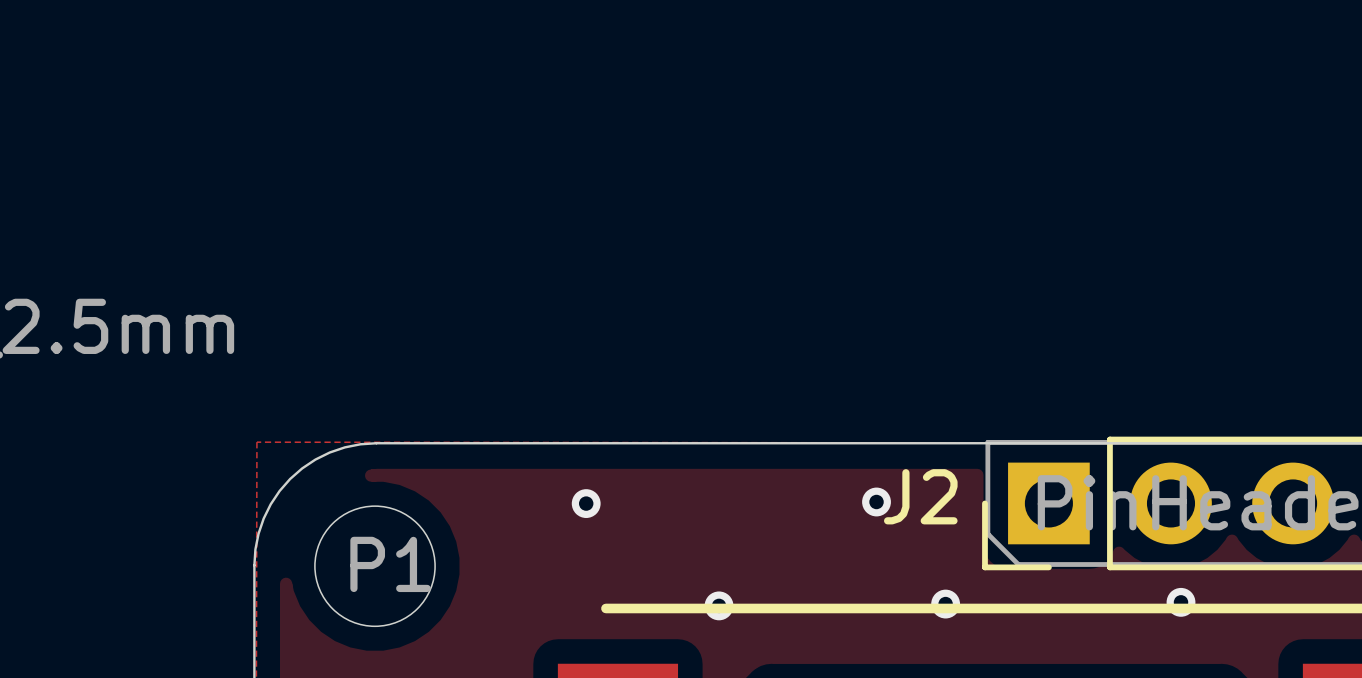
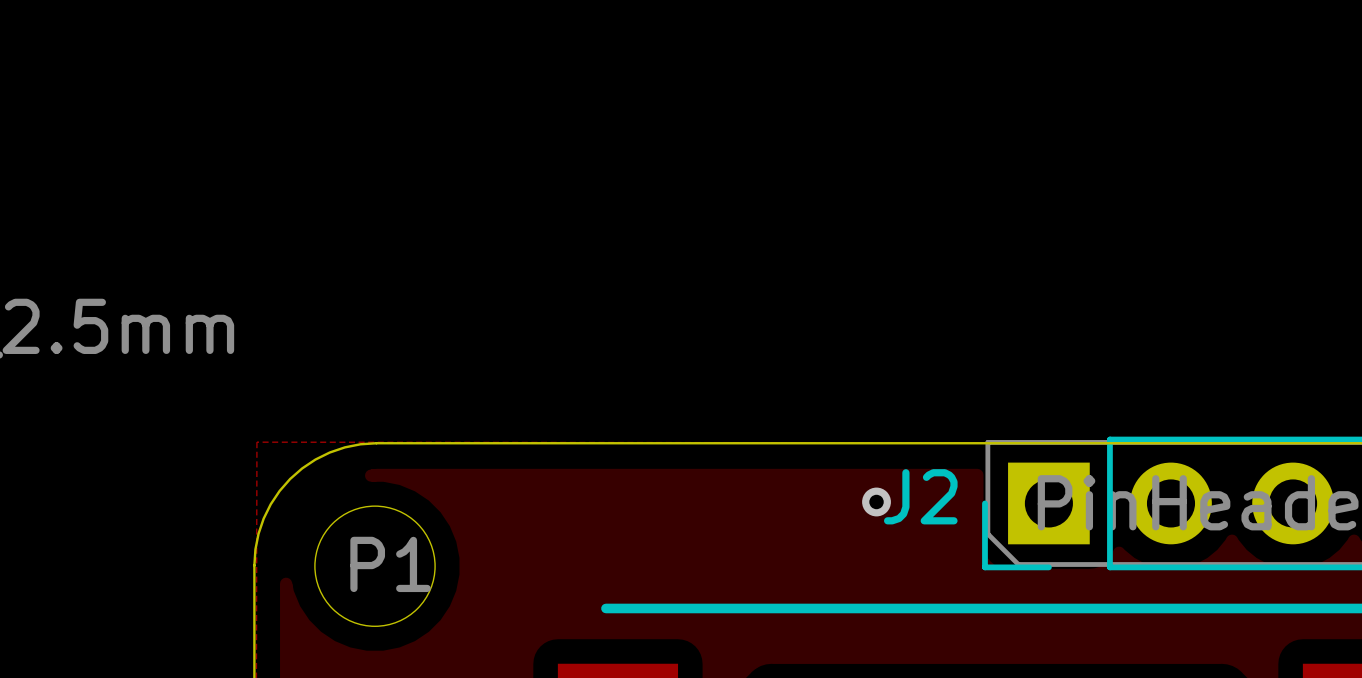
via: (586, 503) -> none
via: (1181, 602) -> none
via: (945, 604) -> none
via: (719, 605) -> none

